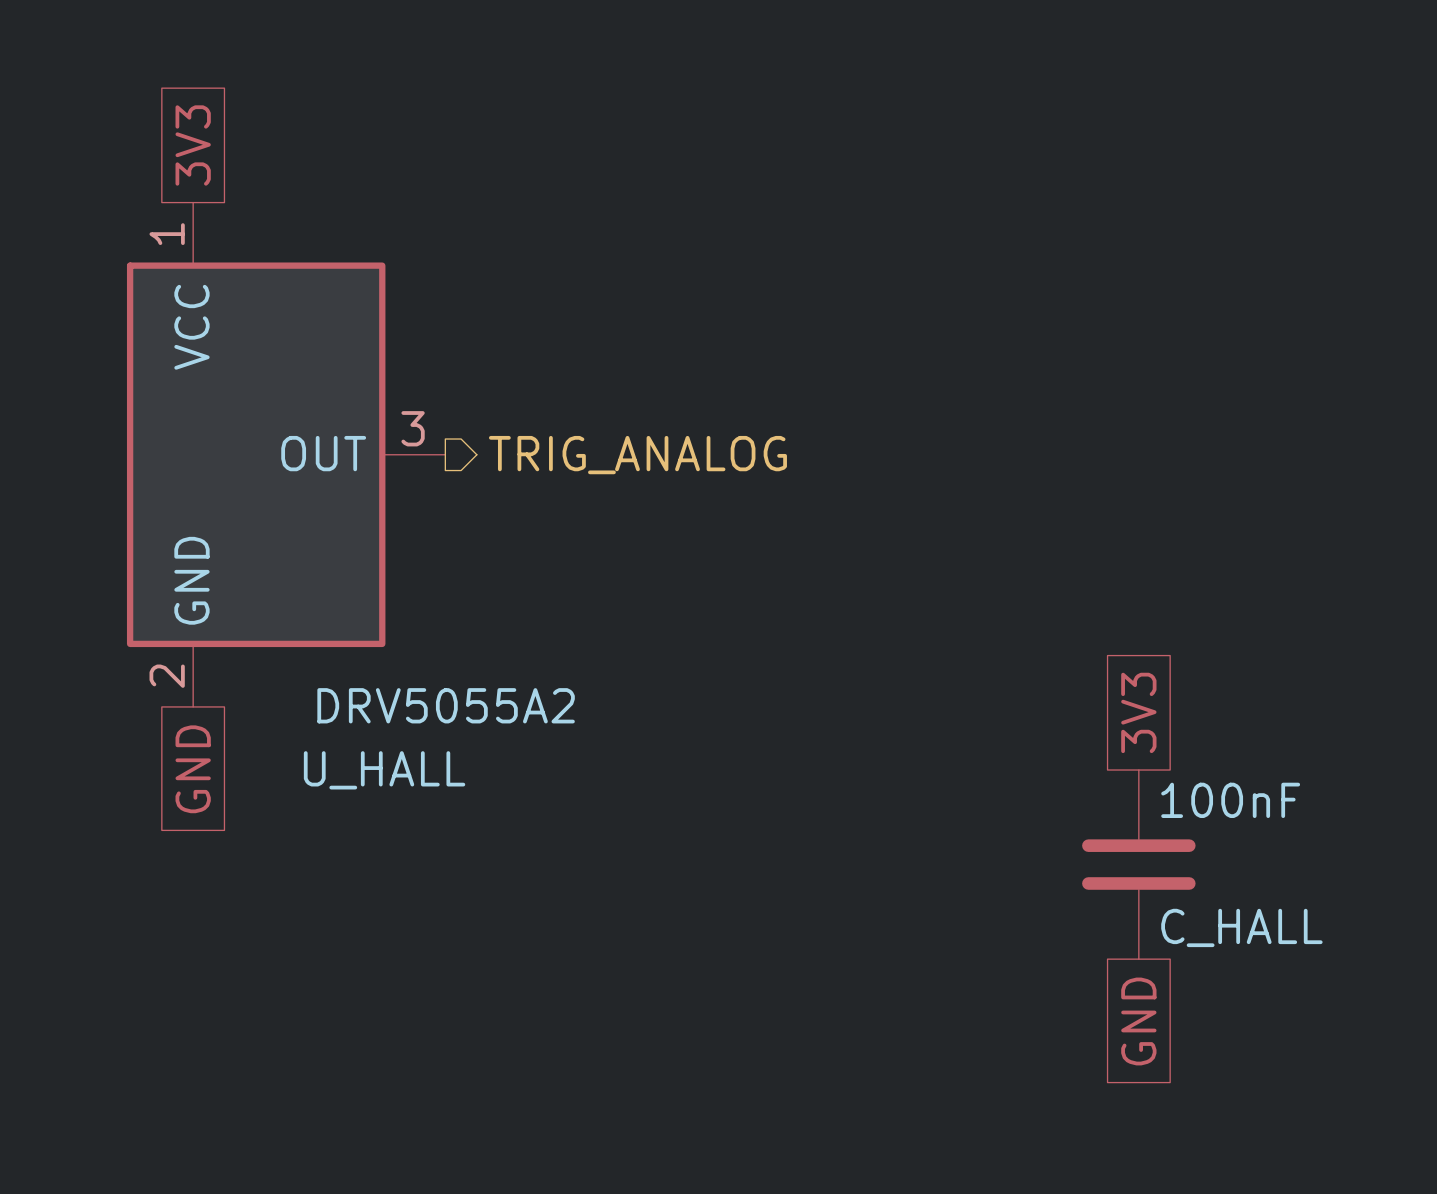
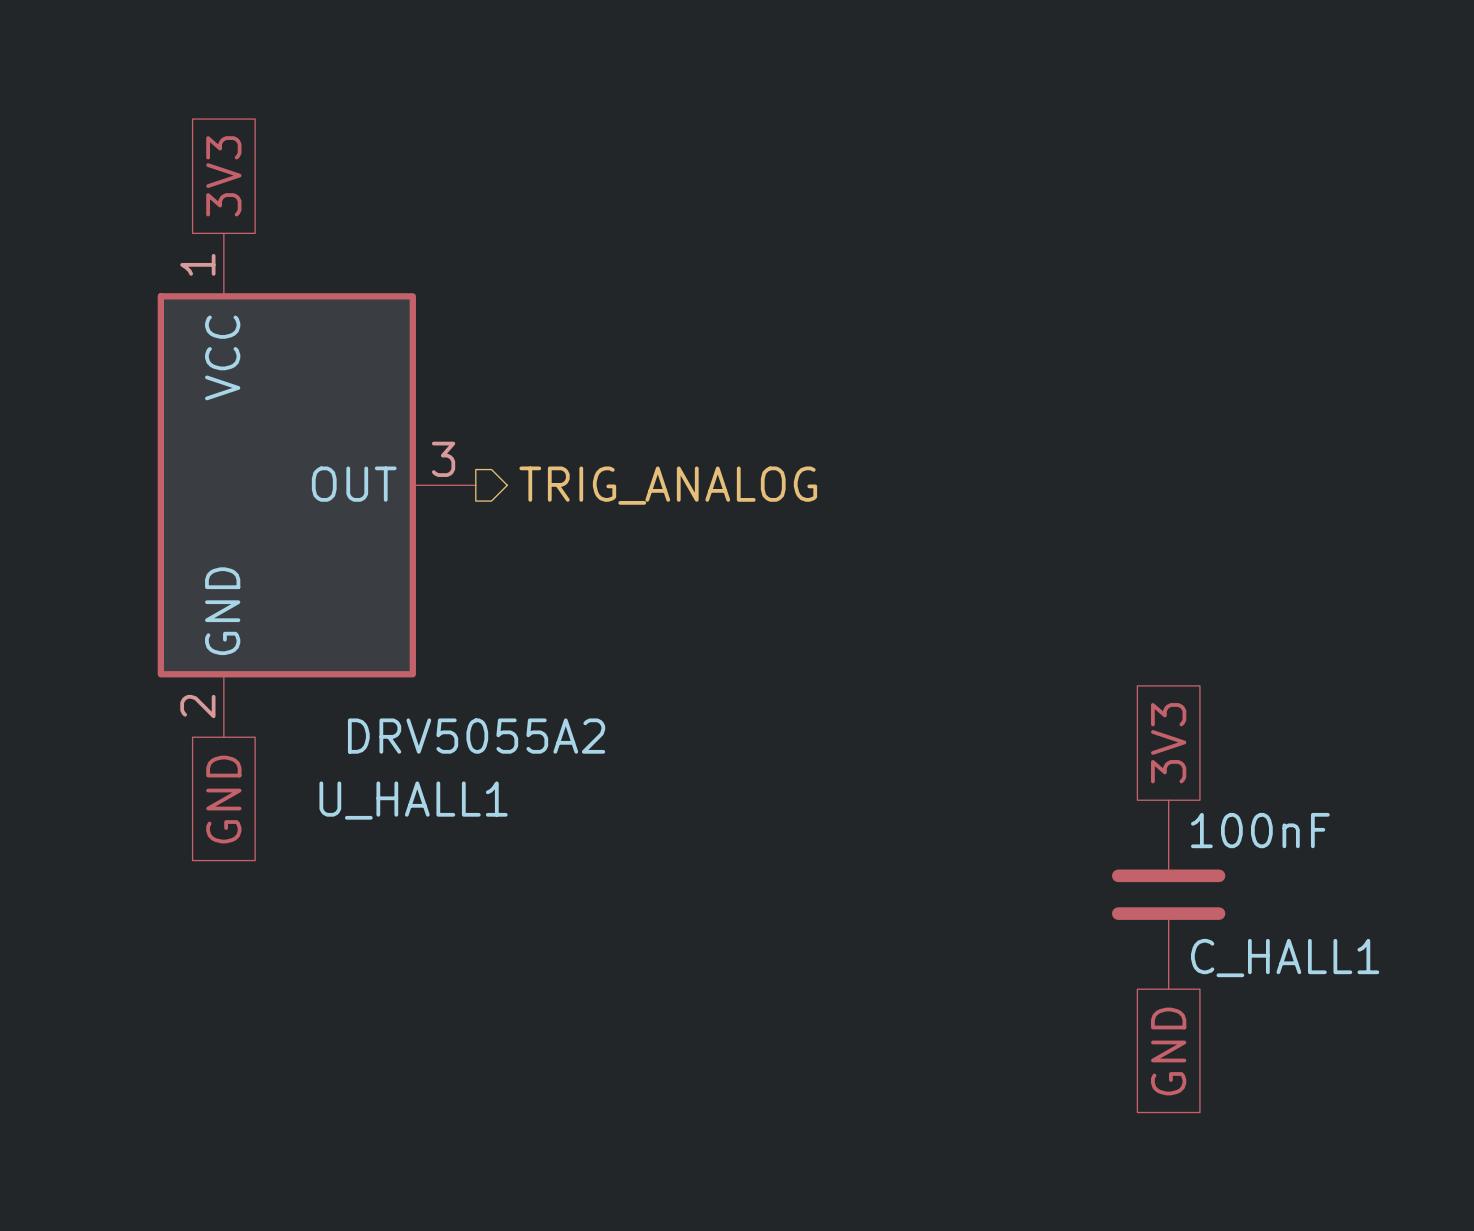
U_HALL name: U_HALL (384, 770) -> U_HALL1 (413, 800)
C_HALL name: C_HALL (1241, 927) -> C_HALL1 (1285, 958)

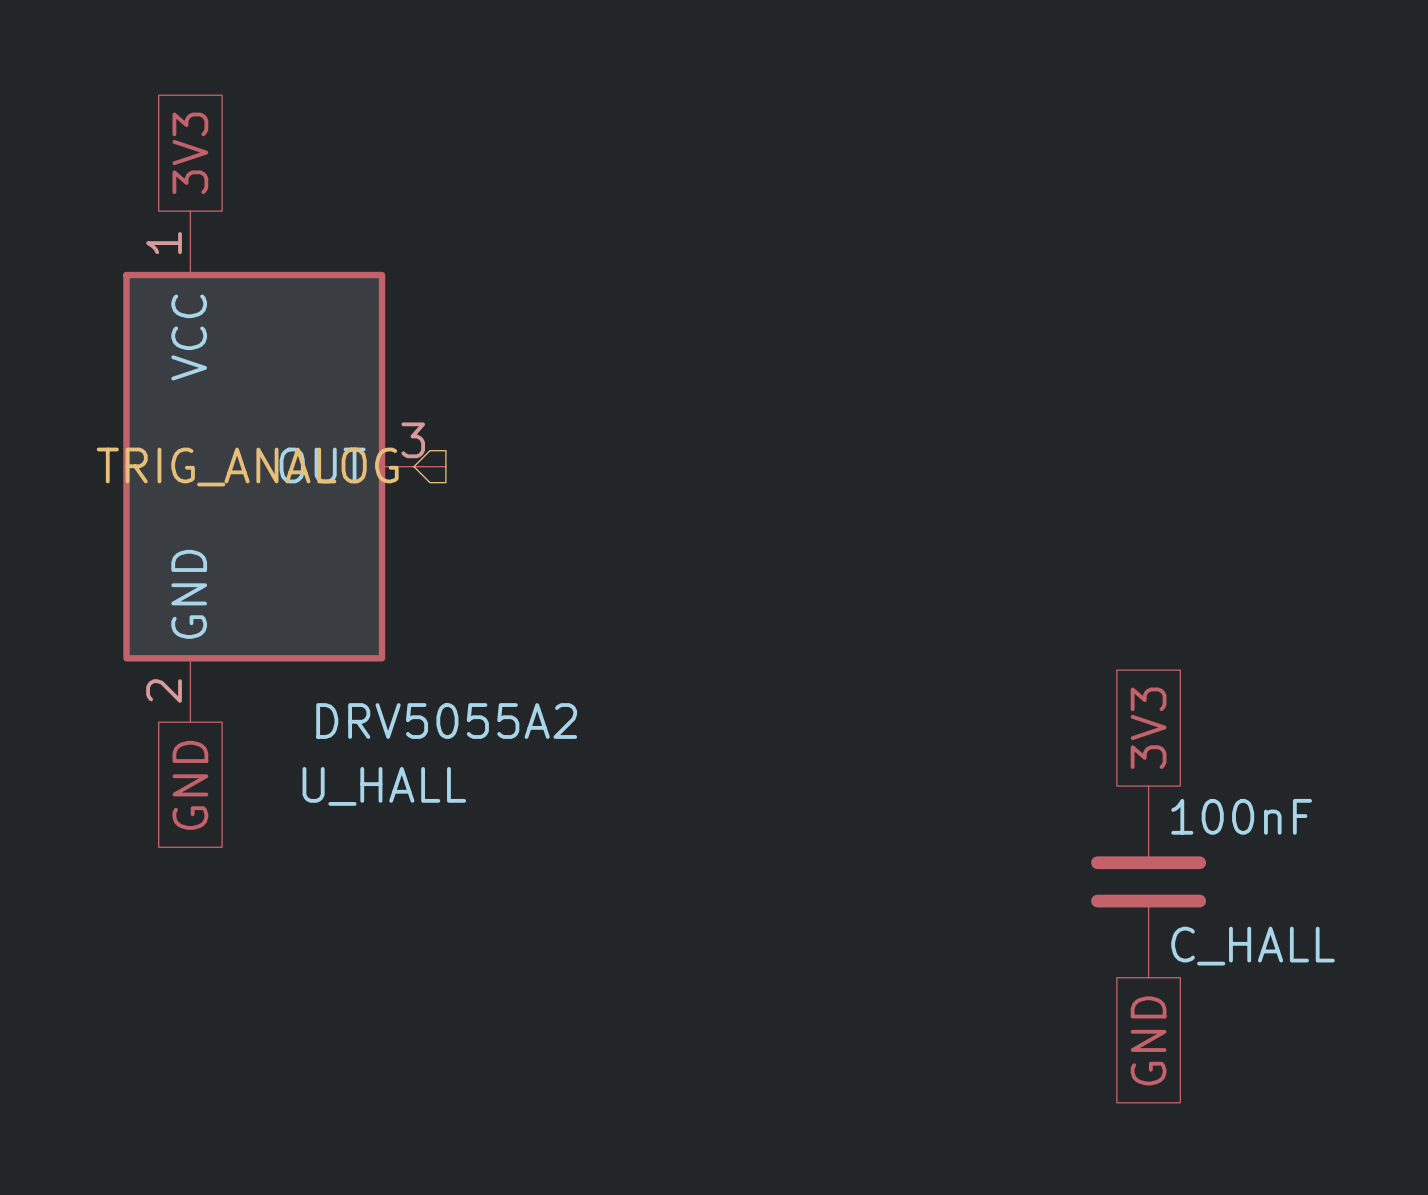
hierarchical label rotation: 0° (668, 485) -> 180° (247, 467)
hierarchical label position: TRIG_ANALOG (668, 485) -> TRIG_ANALOG (247, 467)
U_HALL1 name: U_HALL1 (413, 800) -> U_HALL (384, 786)
C_HALL1 name: C_HALL1 (1285, 958) -> C_HALL (1253, 946)

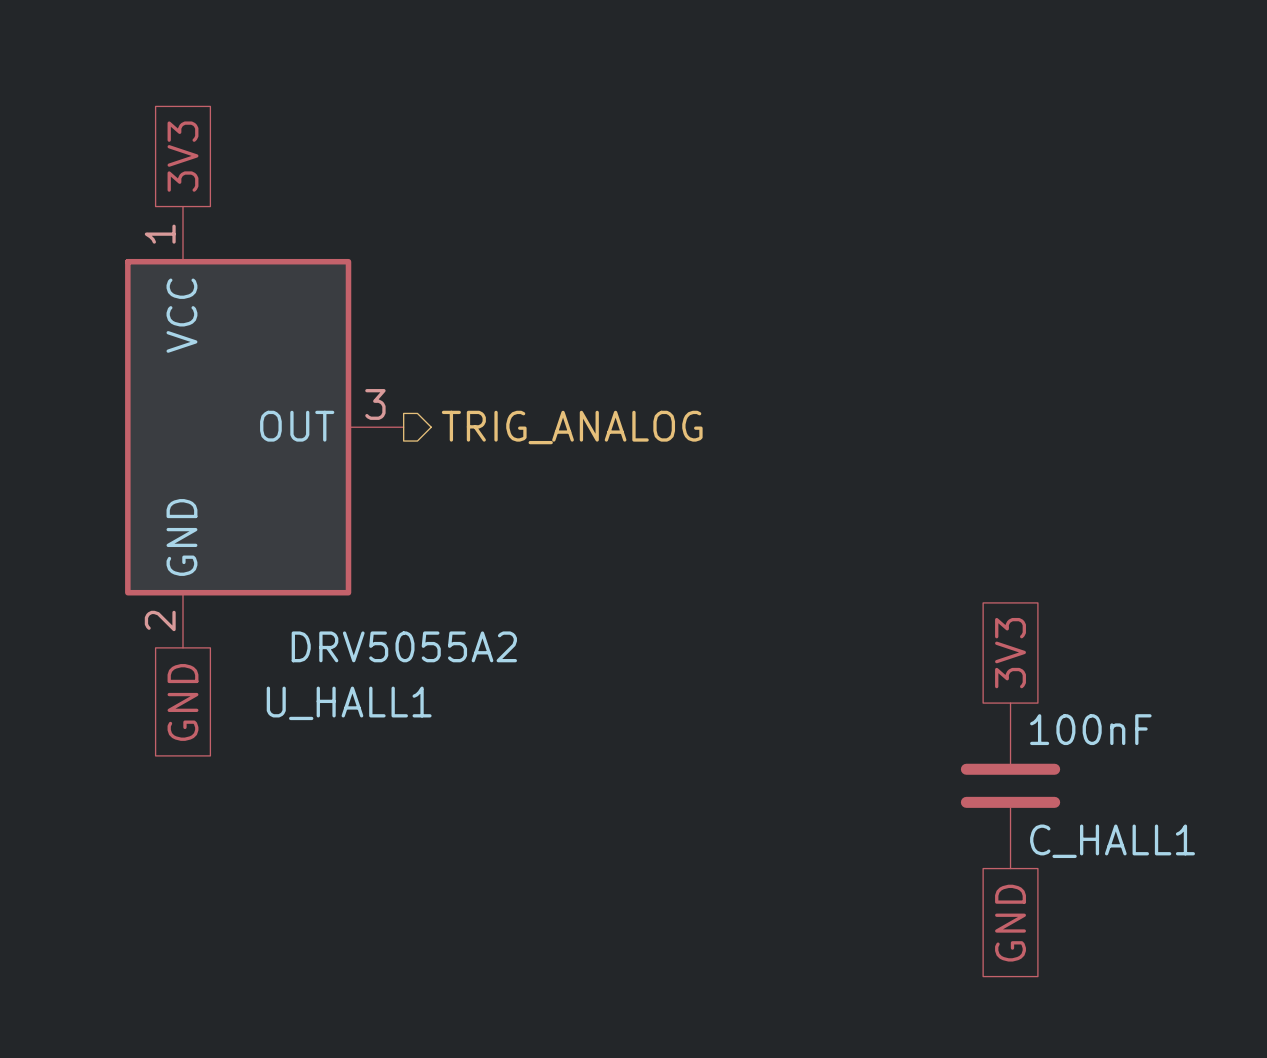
hierarchical label rotation: 0° (247, 467) -> 180° (572, 427)
hierarchical label position: TRIG_ANALOG (247, 467) -> TRIG_ANALOG (572, 427)
U_HALL name: U_HALL (384, 786) -> U_HALL1 (349, 703)
C_HALL name: C_HALL (1253, 946) -> C_HALL1 (1112, 841)

